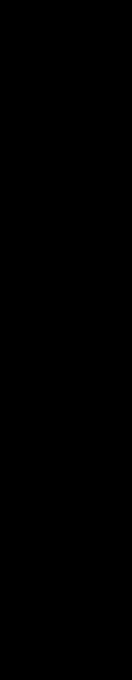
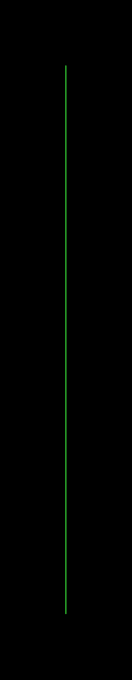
wire: none -> (65, 65) (65, 613)

